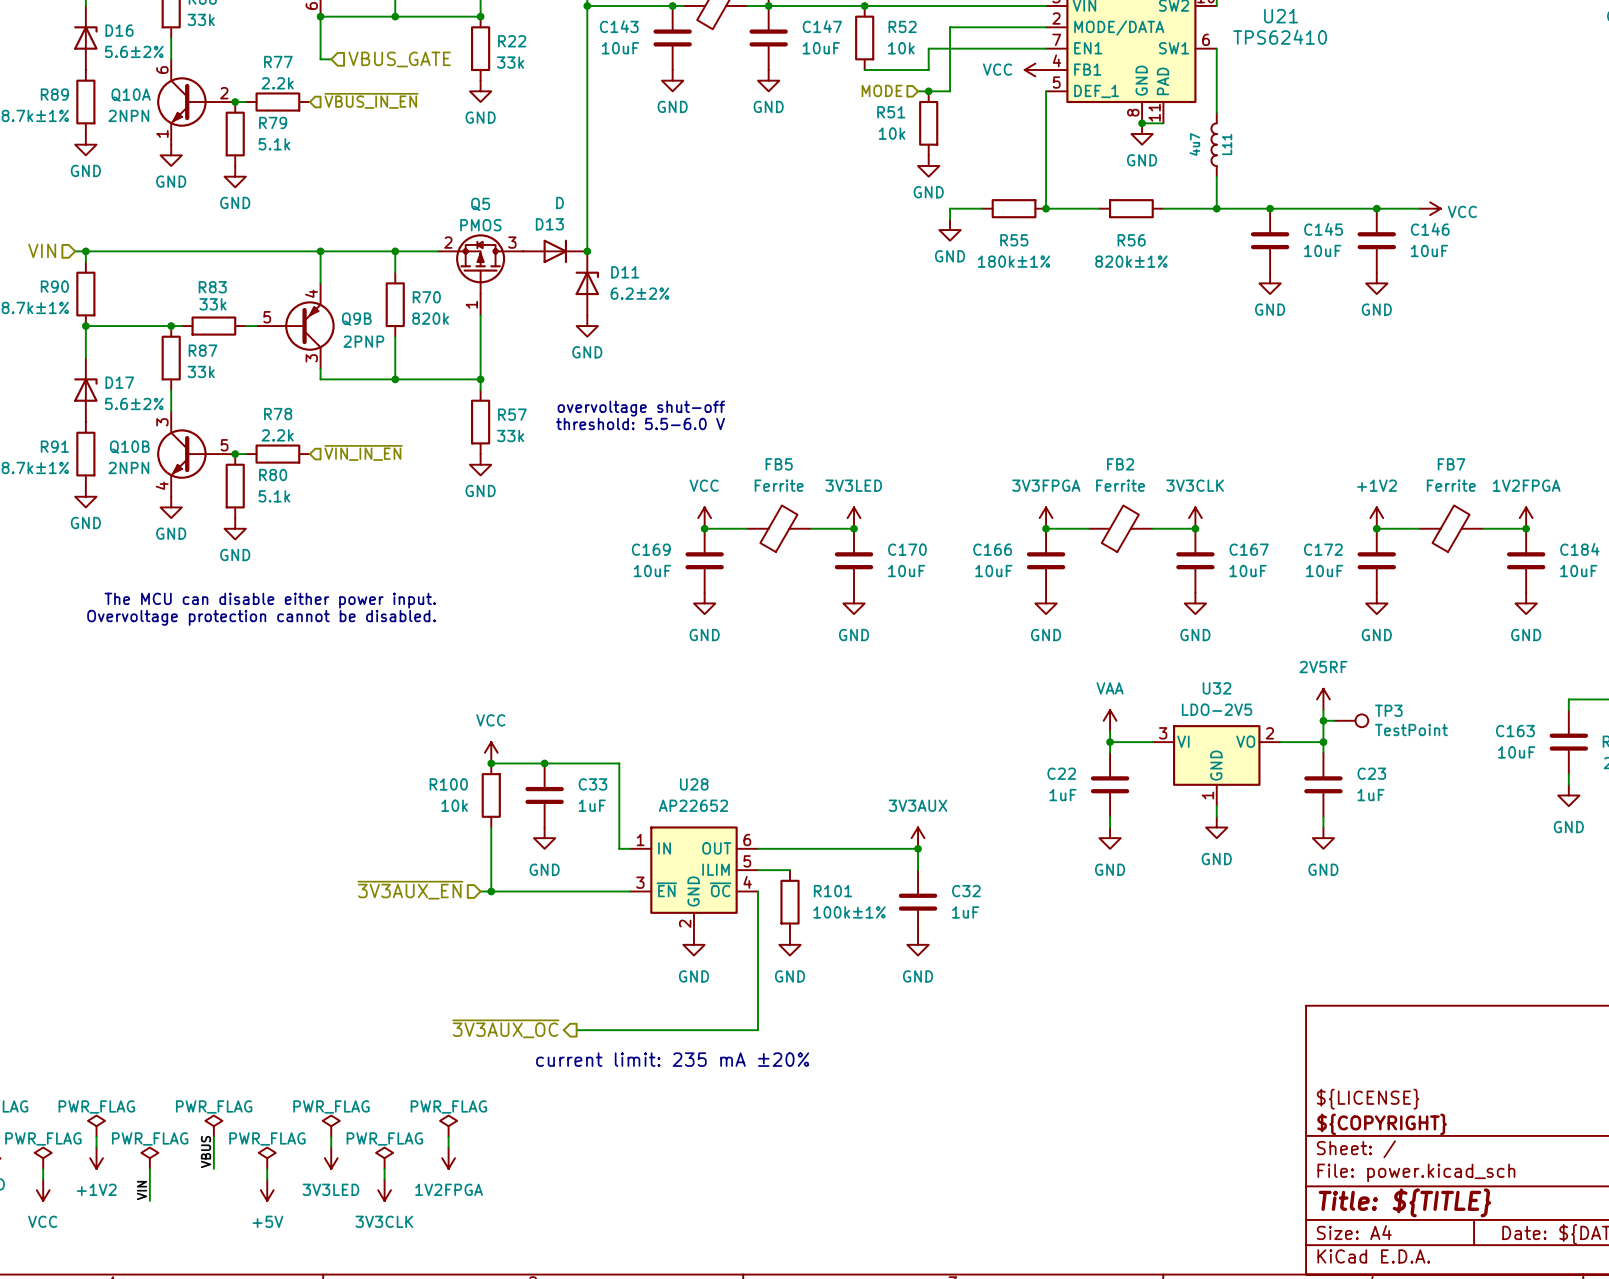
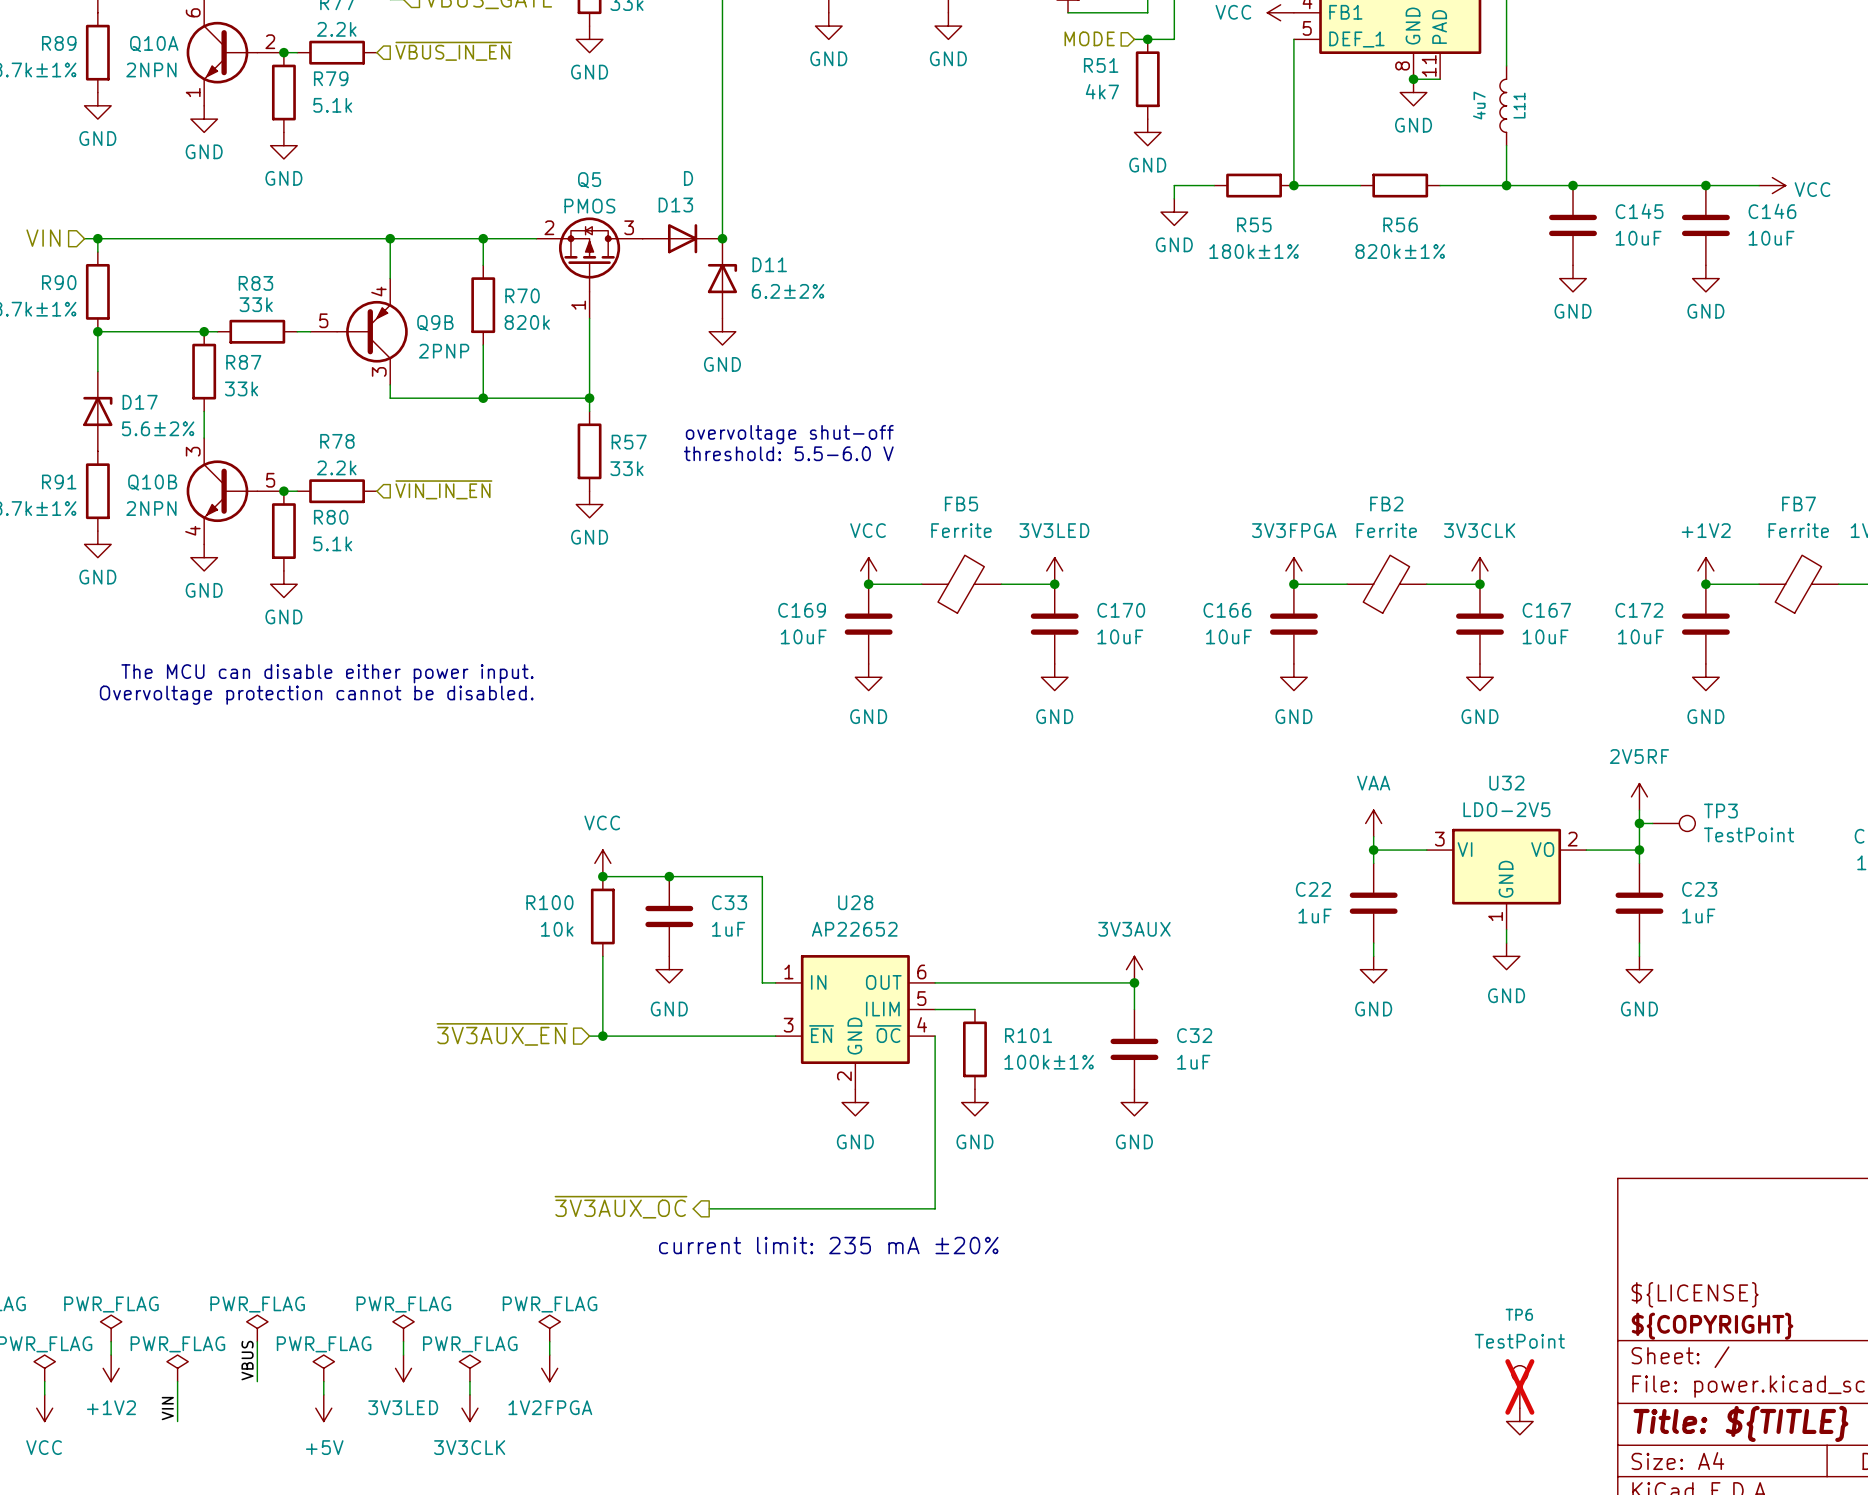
R51 value: 10k (892, 133) -> 4k7 (1102, 91)
TP6: none -> TestPoint (1519, 1386)
power symbol: none -> (1519, 1421)

